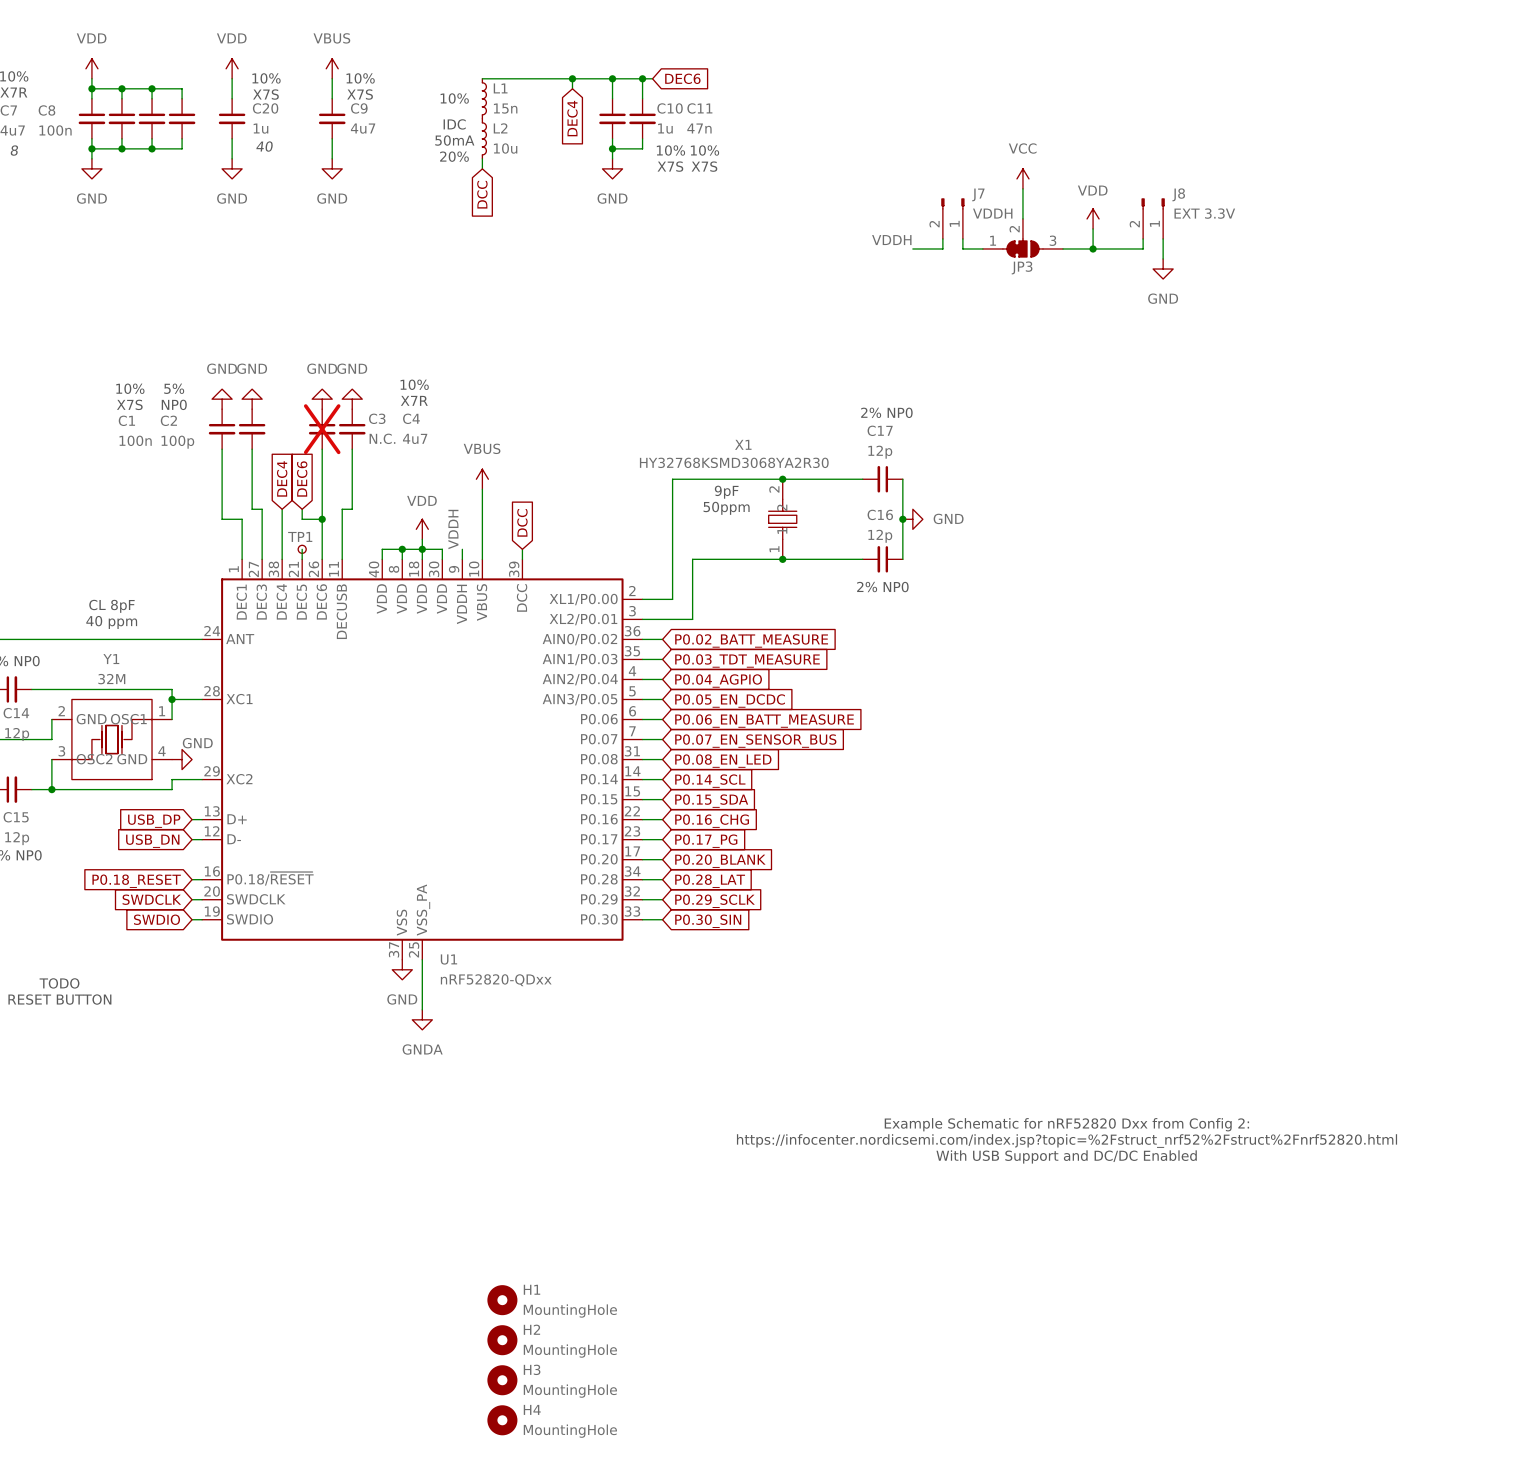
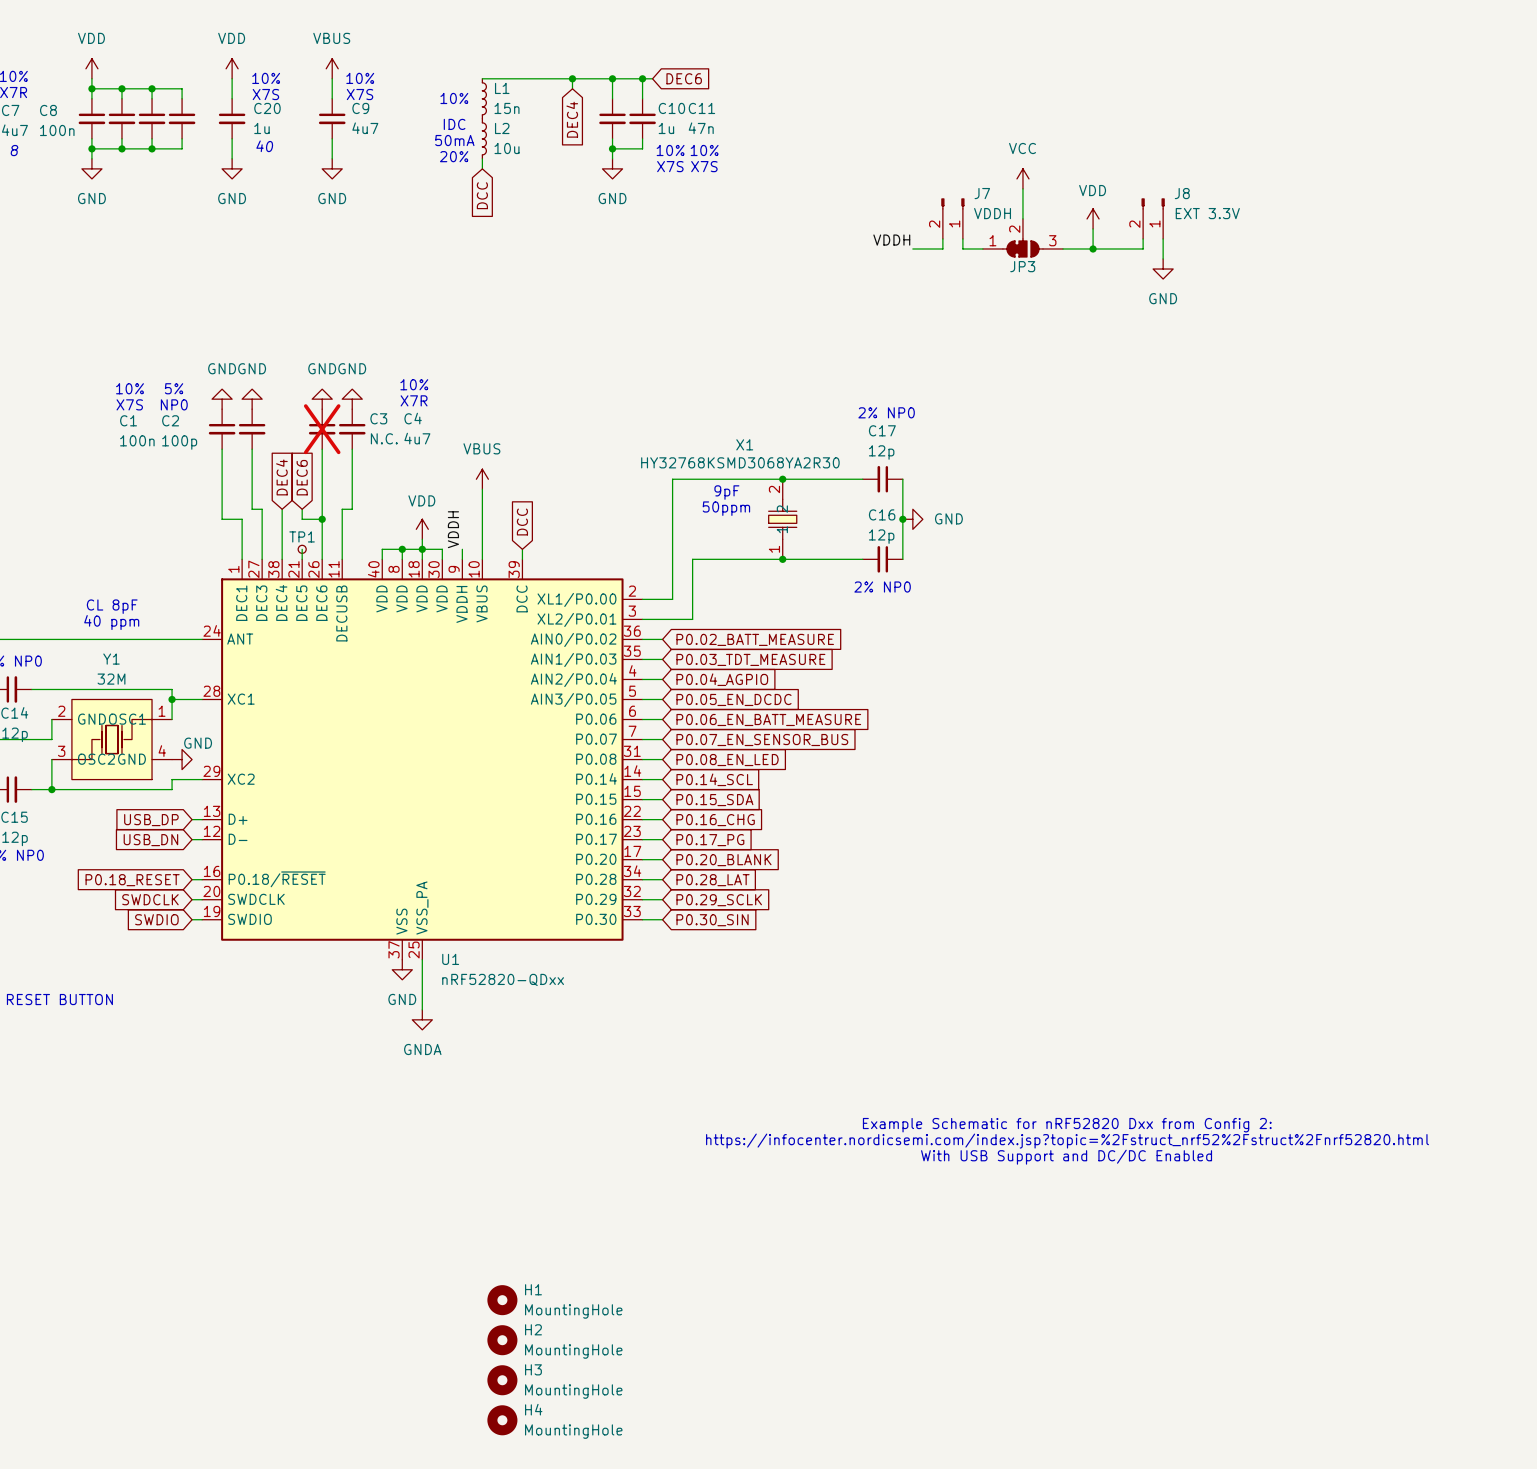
text: TODO (59, 983) -> none

